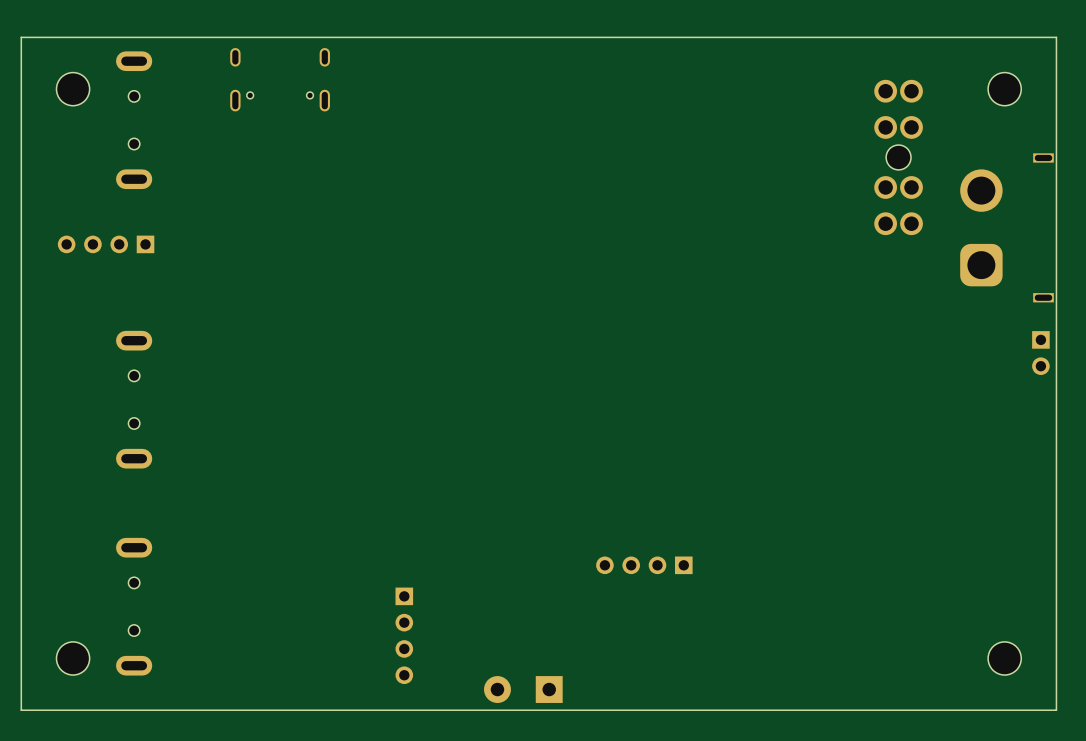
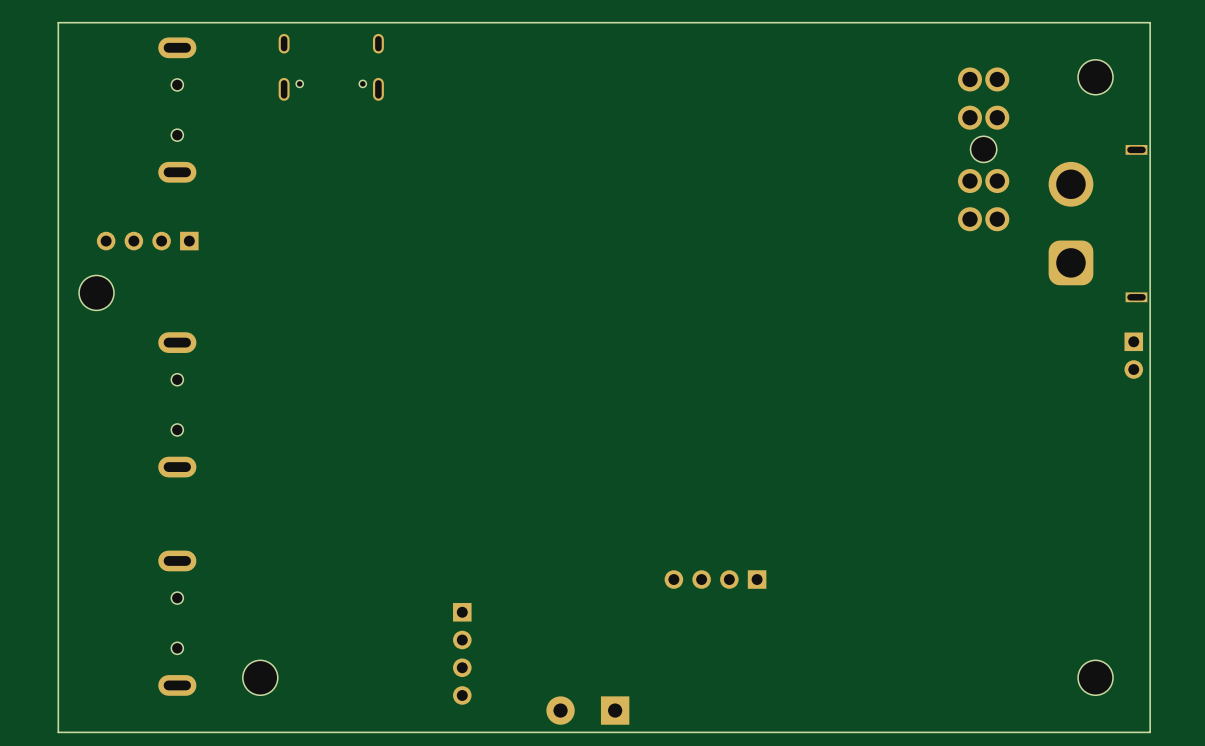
part: (73, 89) -> none
part: none -> (96, 292)
part position: (73, 658) -> (260, 677)

